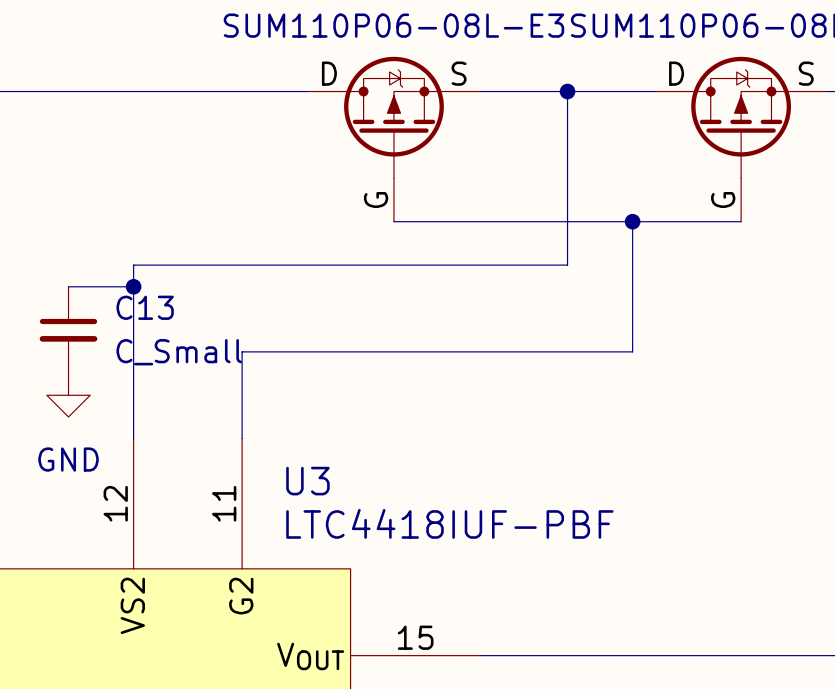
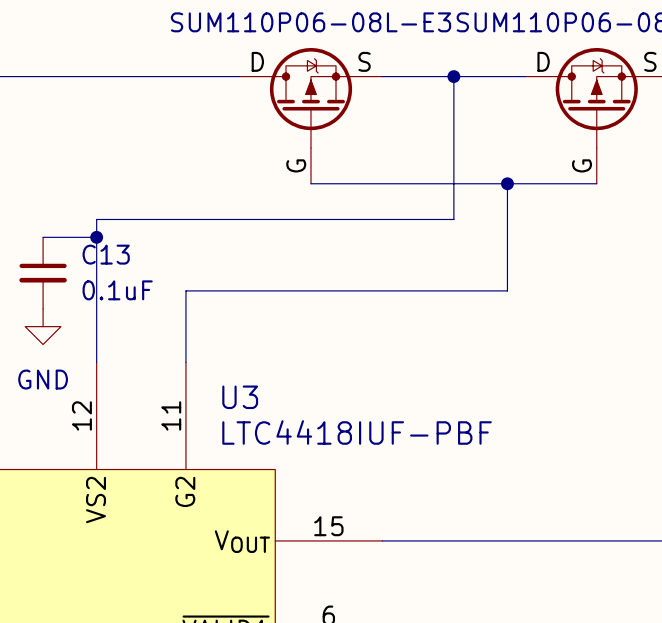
C13 value: C_Small (179, 352) -> 0.1uF (117, 290)

